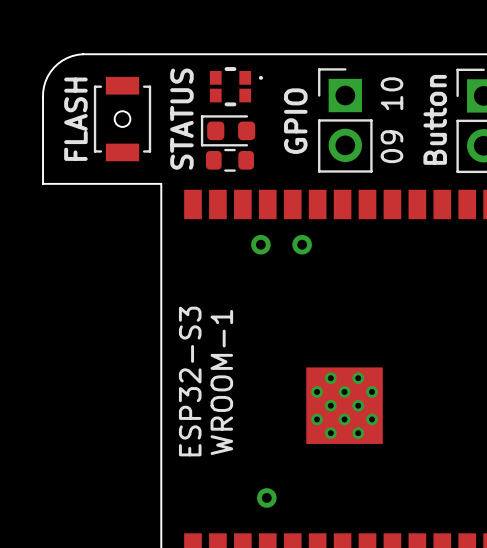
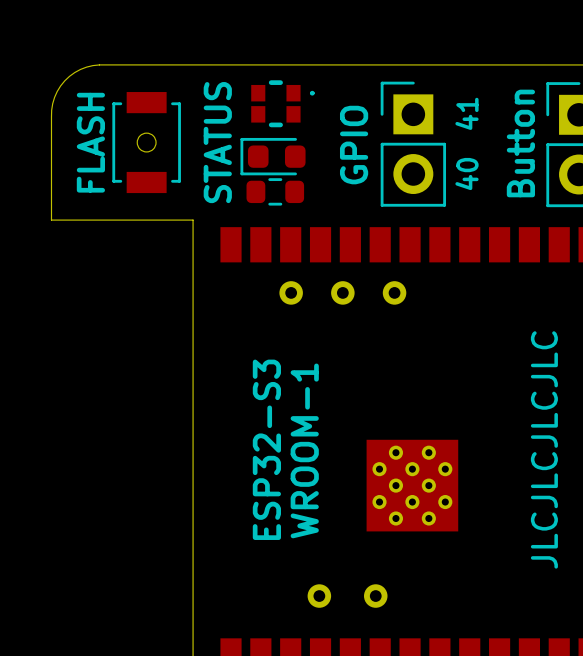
text: 10 (392, 93) -> 41 (466, 113)
text: 09 (392, 146) -> 40 (466, 174)
part: none -> (291, 292)
part: (260, 244) -> none
part: none -> (342, 292)
part: (302, 244) -> none
part: none -> (394, 292)
text: none -> JLCJLCJLCJLC (544, 449)
text: none -> WROOM-1 (304, 450)
text: ESP32-S3 (190, 381) -> none
text: WROOM-1 (221, 382) -> ESP32-S3 (266, 449)
part: none -> (375, 596)

